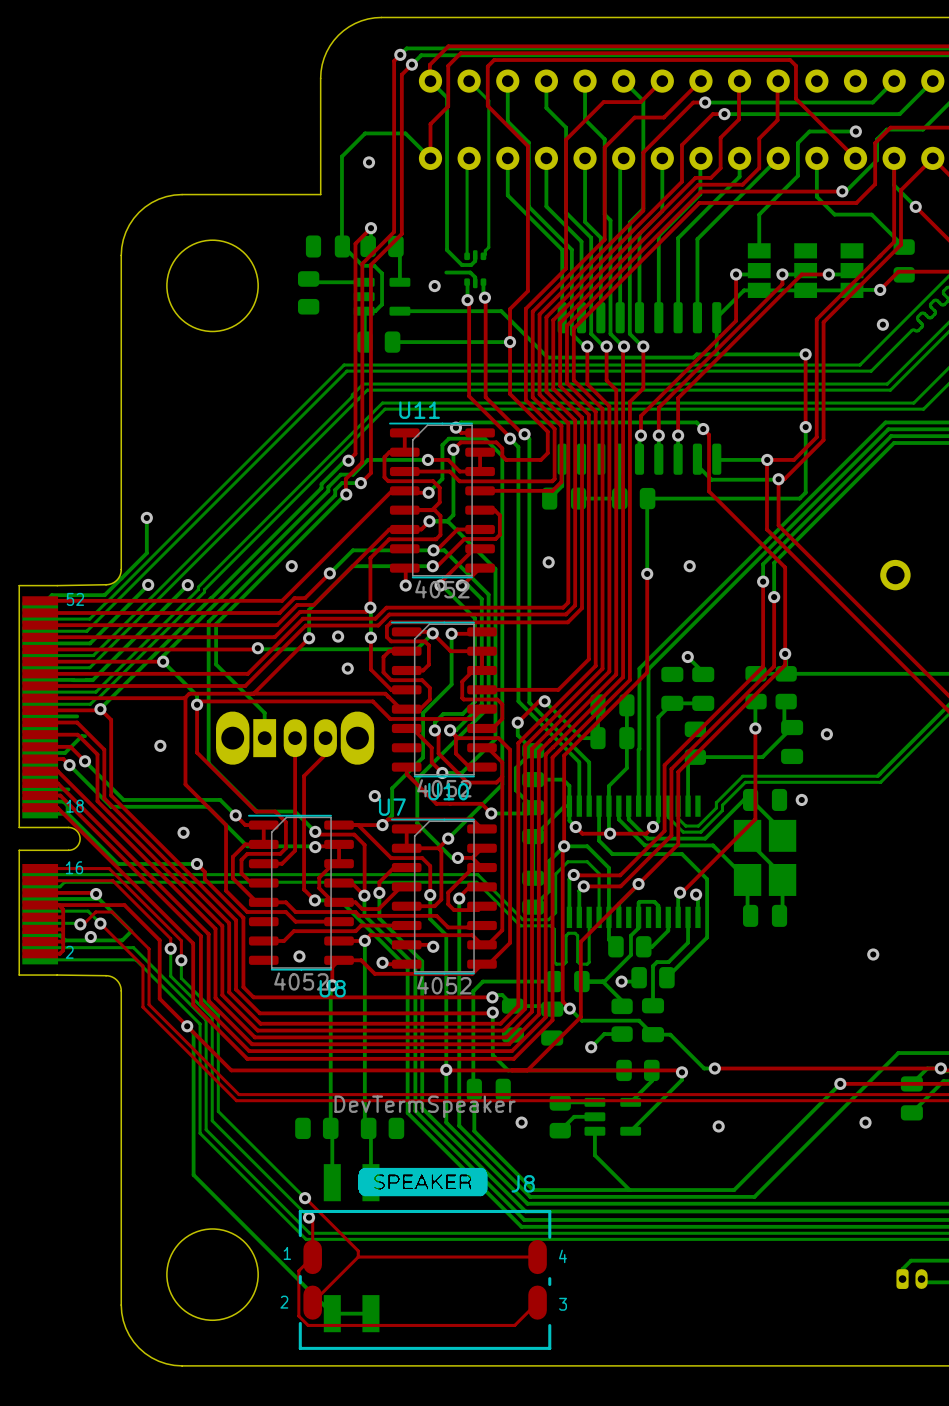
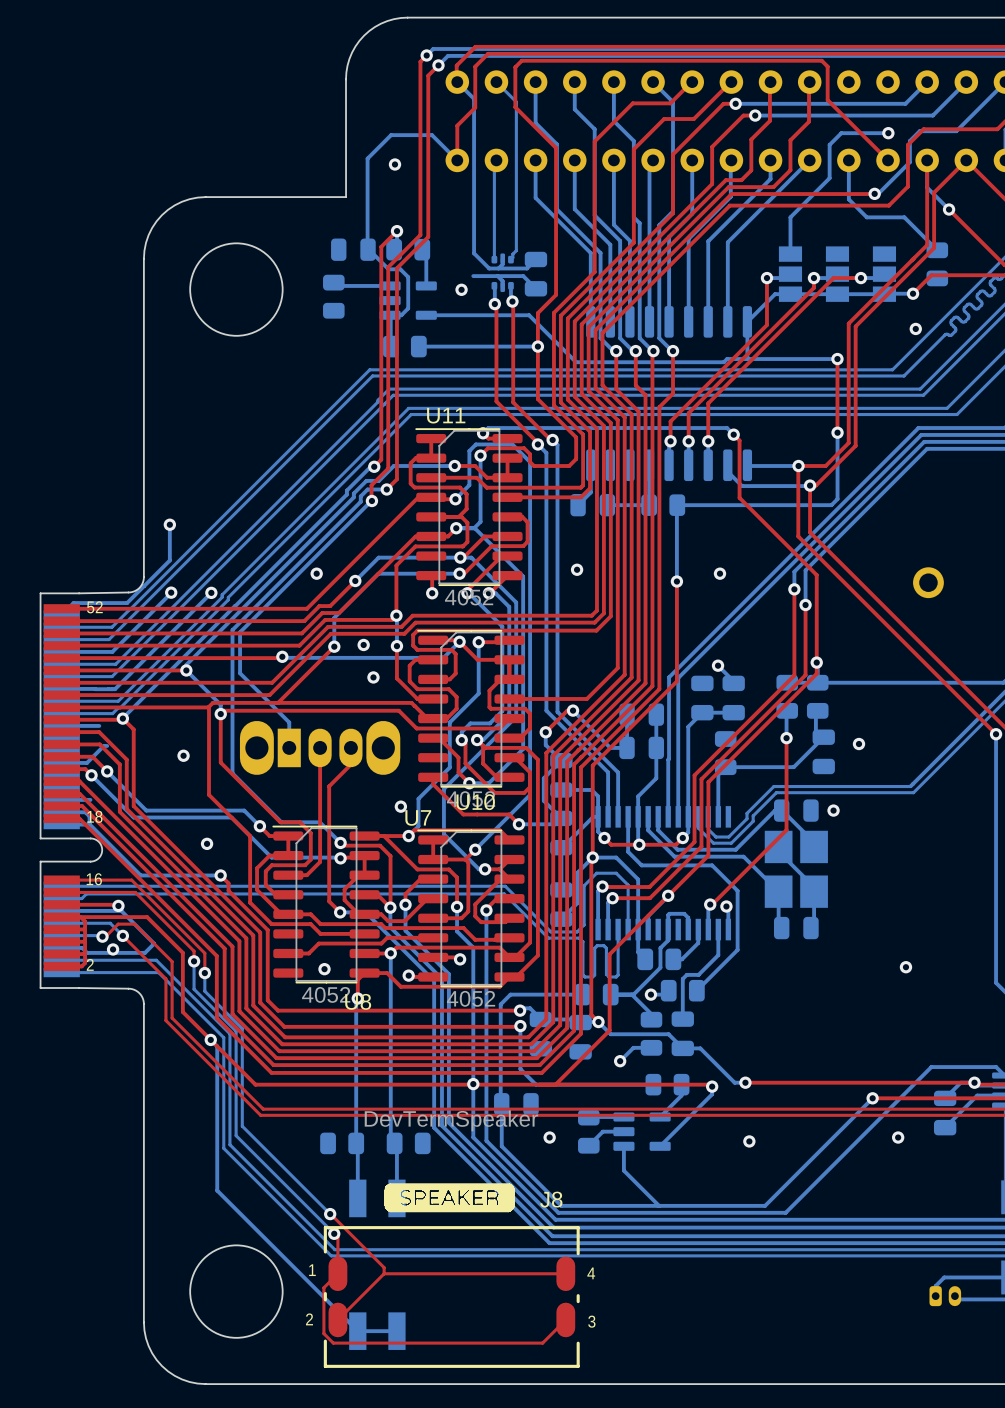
bottom track: none -> (535, 259) (526, 268) (498, 268)
part: none -> (535, 274)
bottom track: none -> (497, 276) (523, 276) (535, 288)

